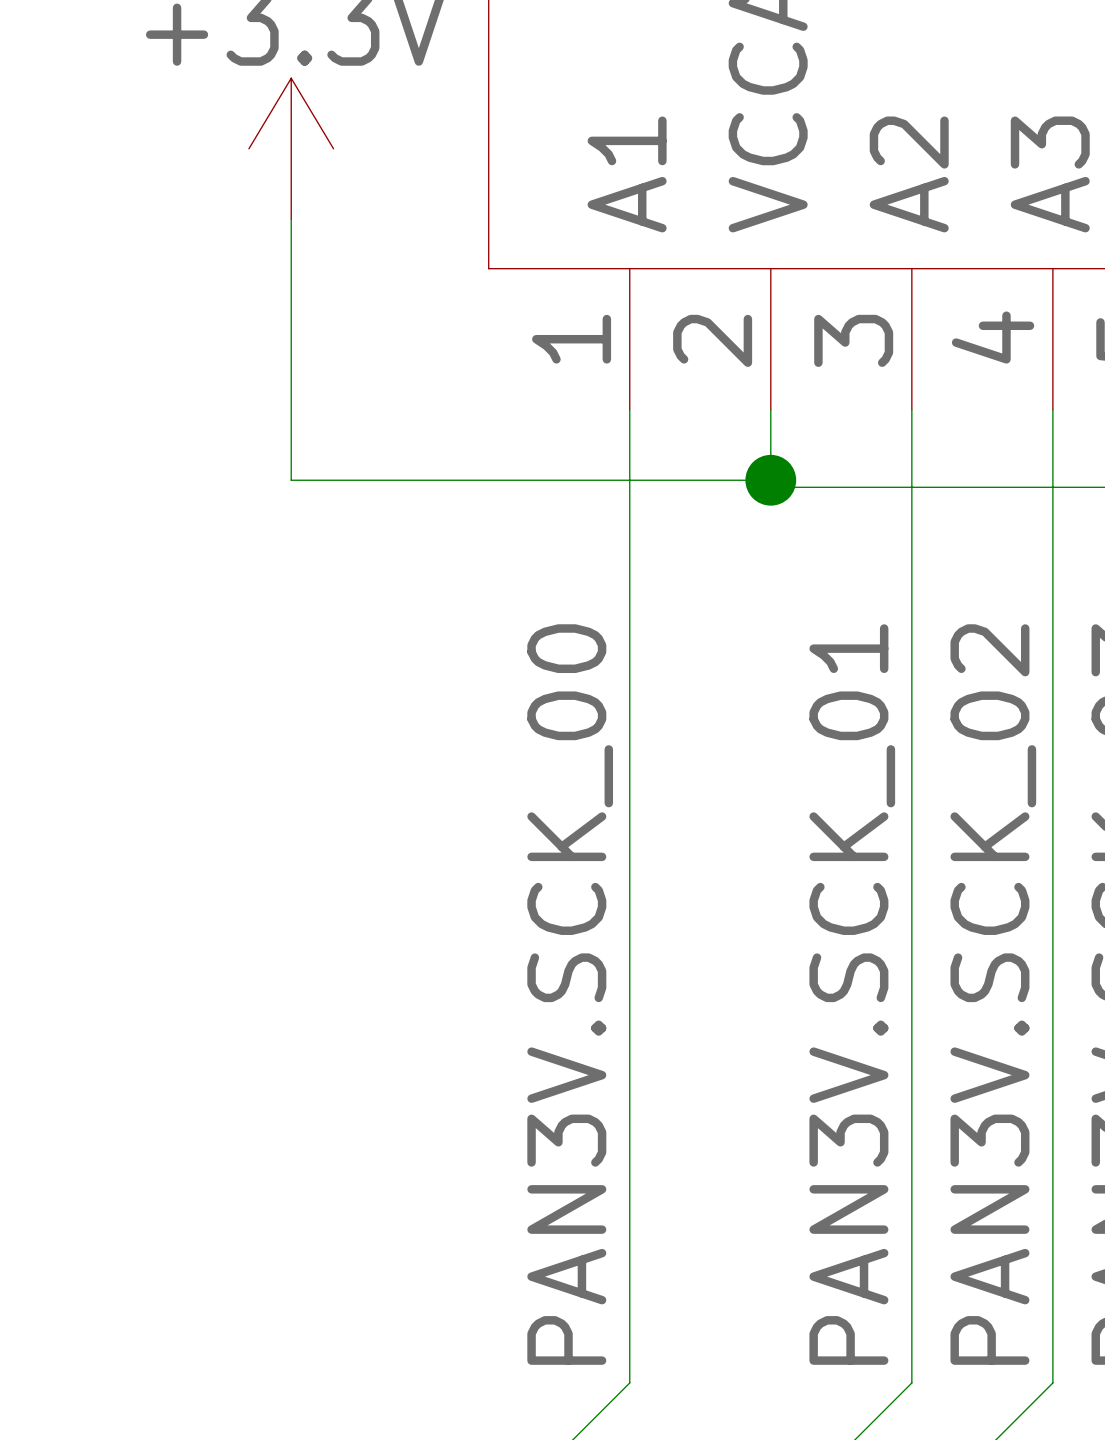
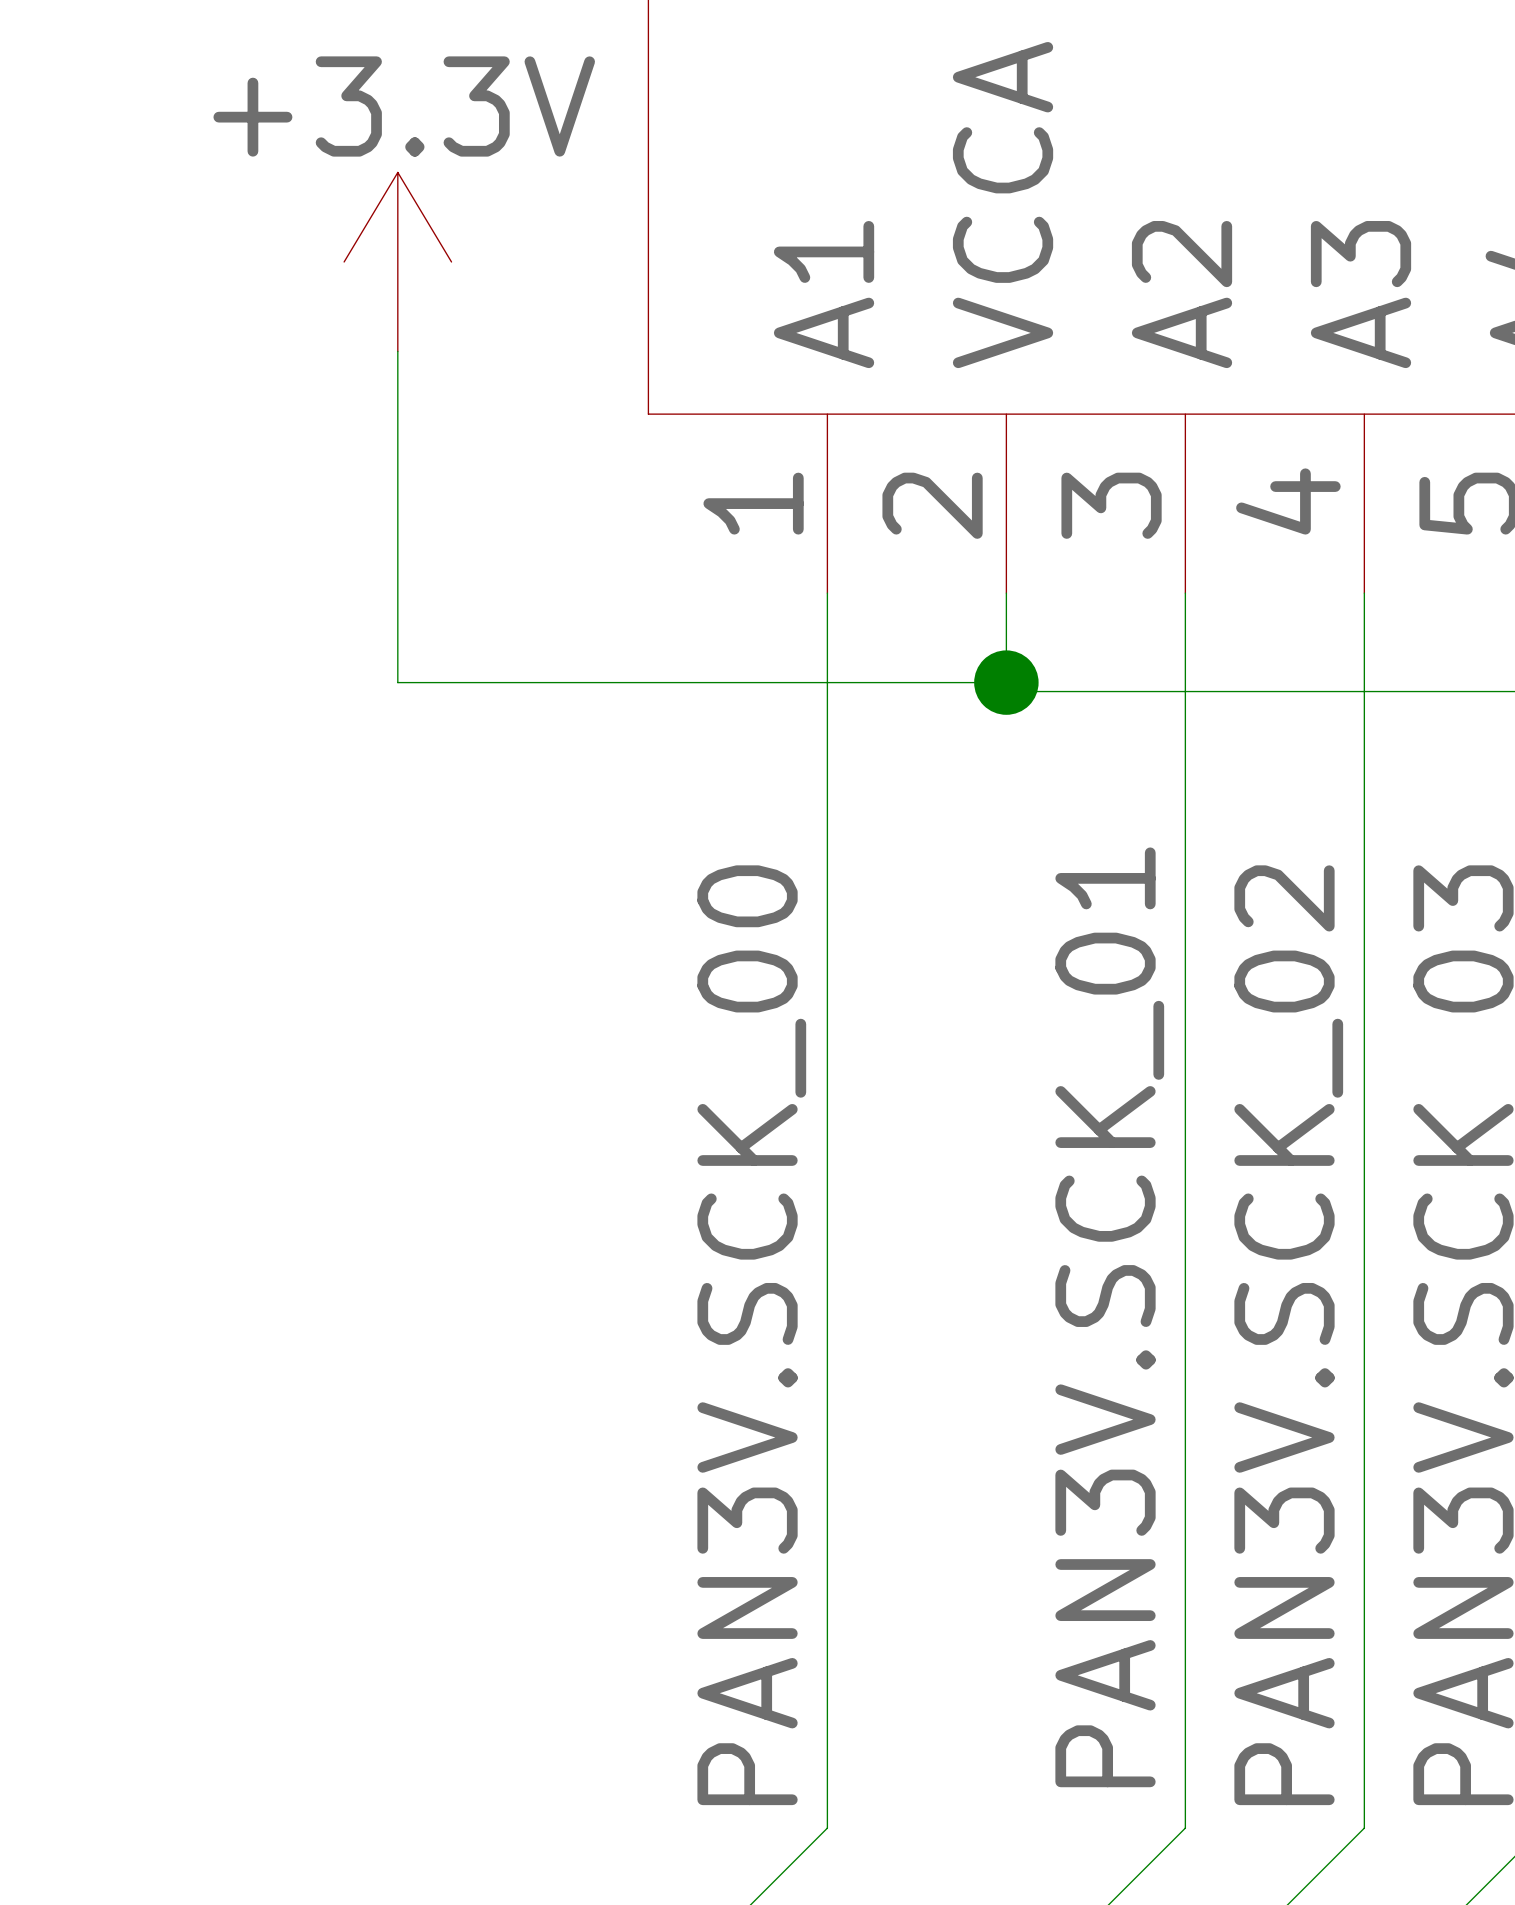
label position: PAN3V.SCK_01 (852, 994) -> PAN3V.SCK_01 (1109, 1317)

